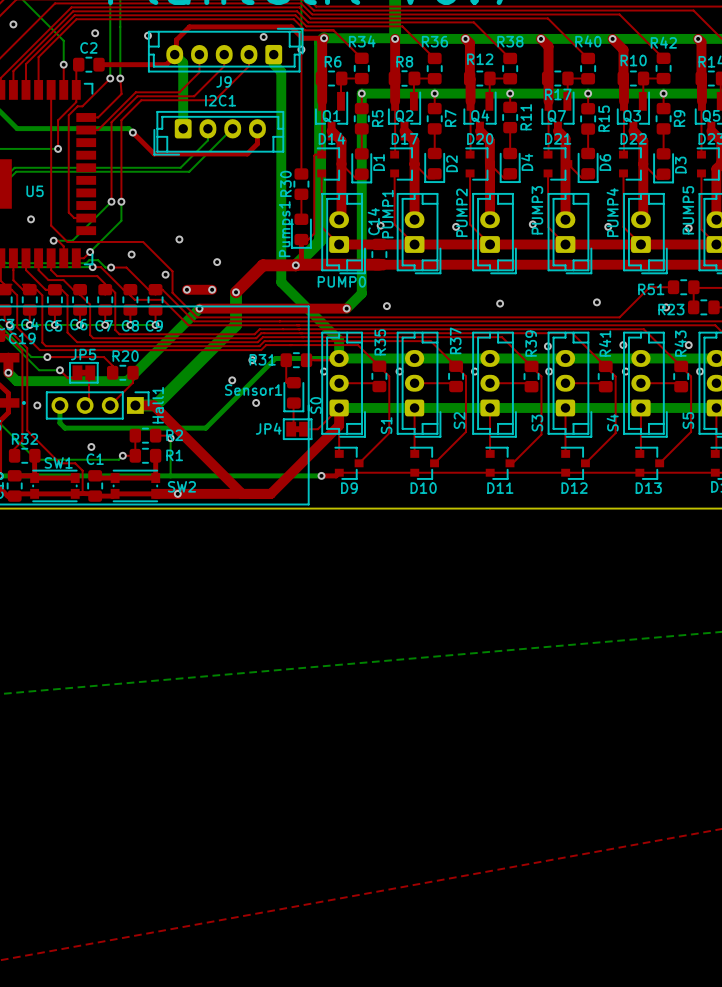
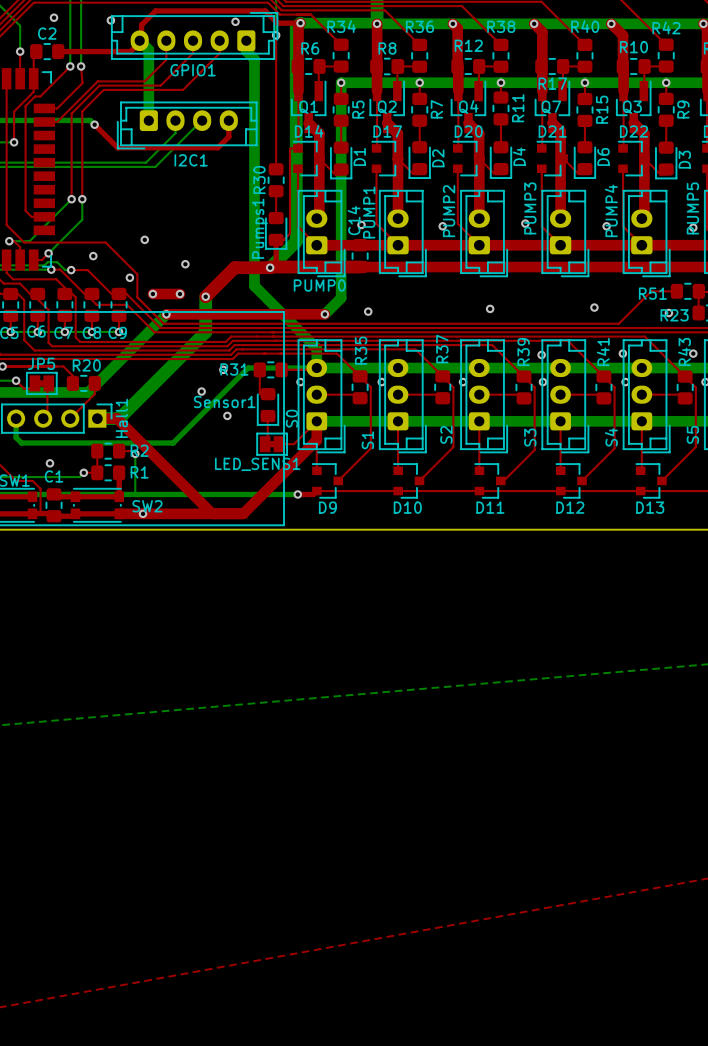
J9 name: J9 (223, 81) -> GPIO1 (193, 70)
I2C1 name position: I2C1 (220, 100) -> I2C1 (191, 160)
JP4 name: JP4 (268, 428) -> LED_SENS1 (257, 464)

